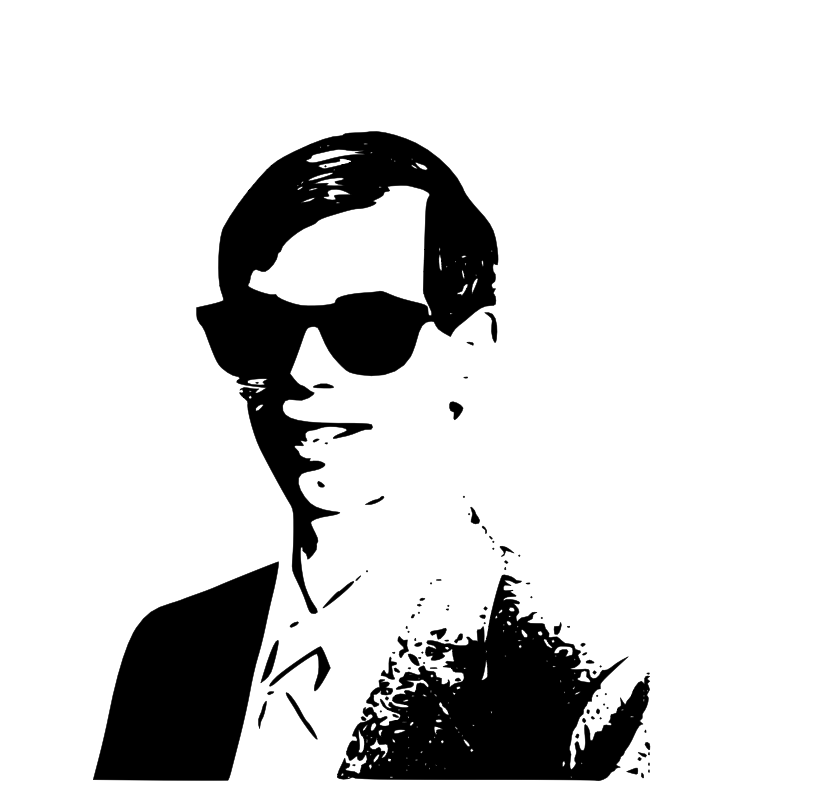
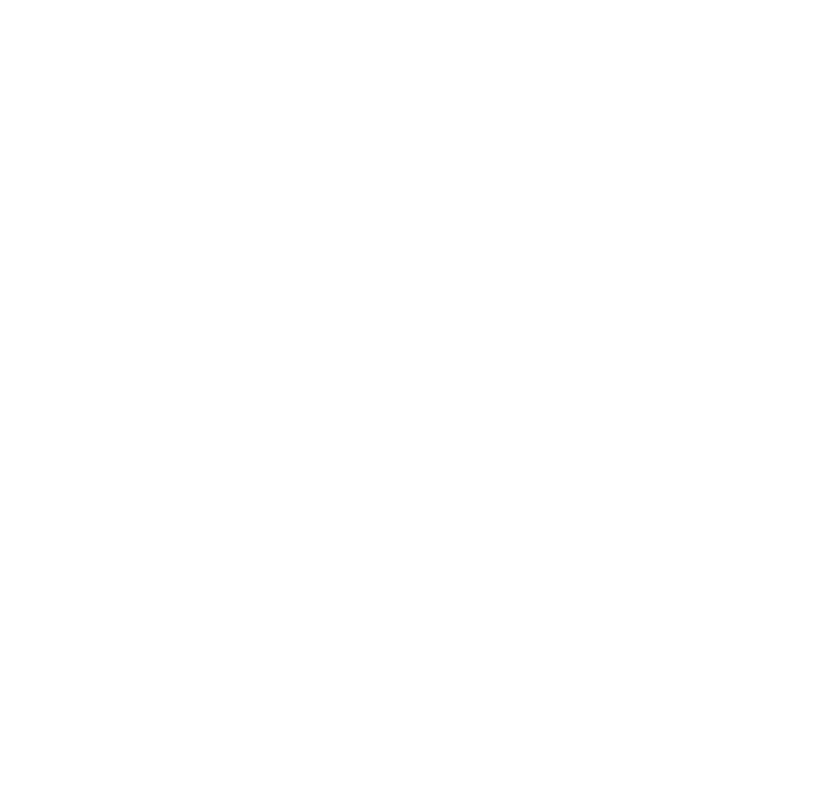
drawing: [92, 131, 651, 782] -> none

